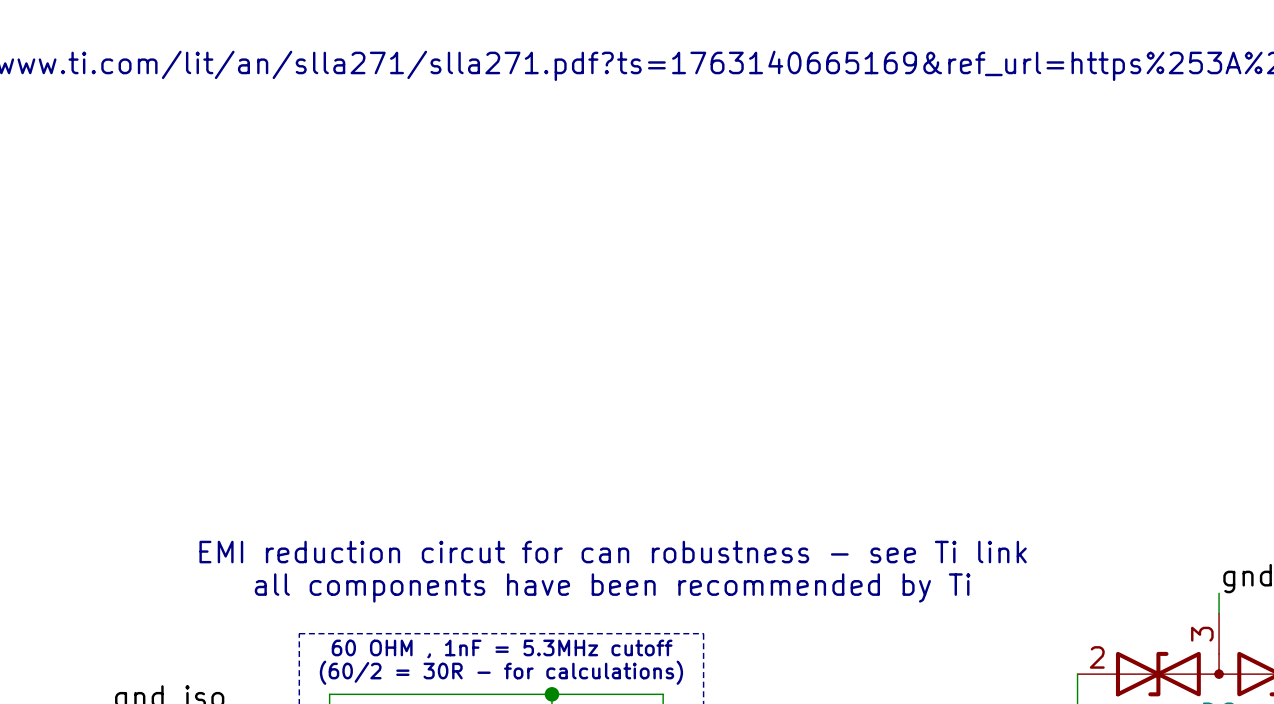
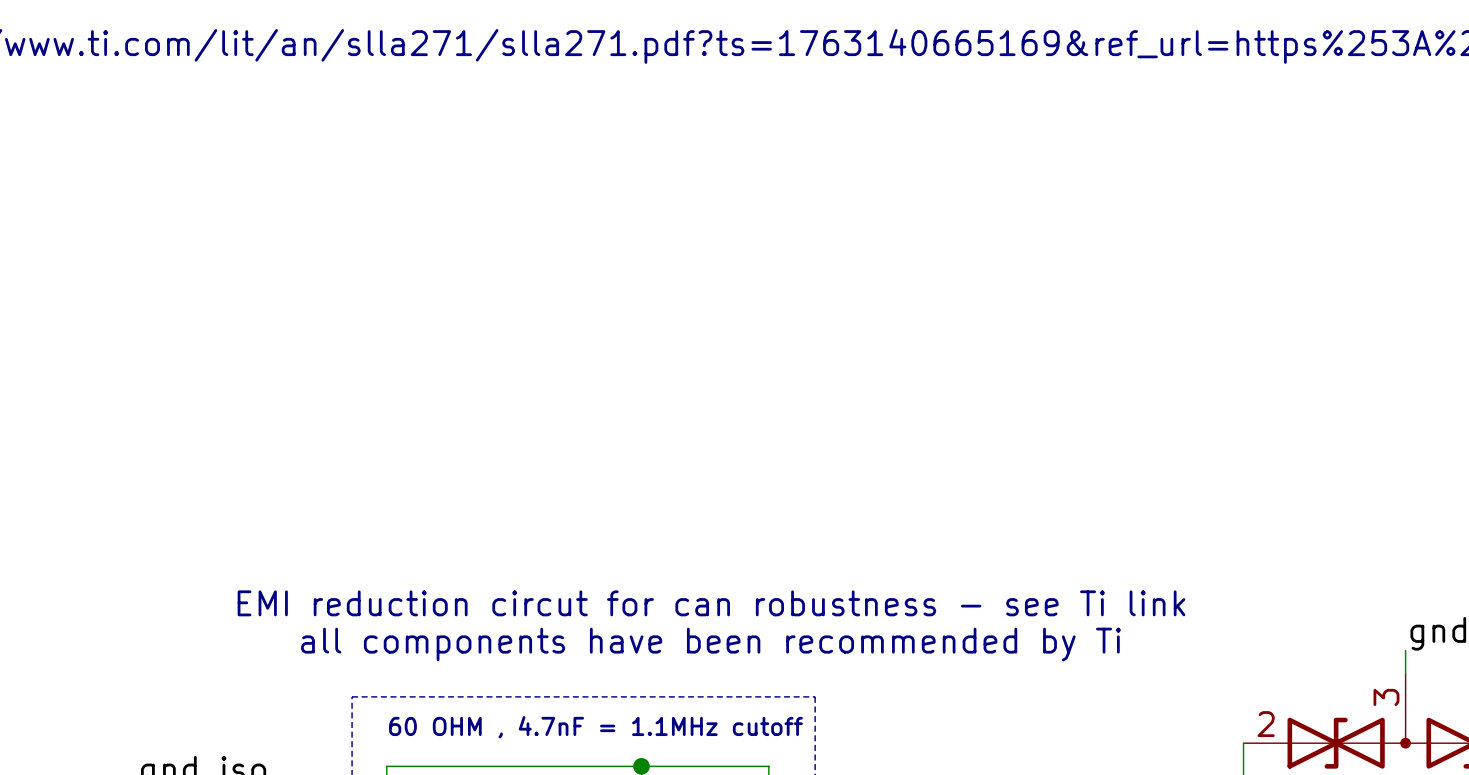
text: 60 OHM , 1nF = 5.3MHz cutoff (502, 648) -> 60 OHM , 4.7nF = 1.1MHz cutoff (595, 727)
text: (60/2 = 30R - for calculations) (501, 672) -> none

